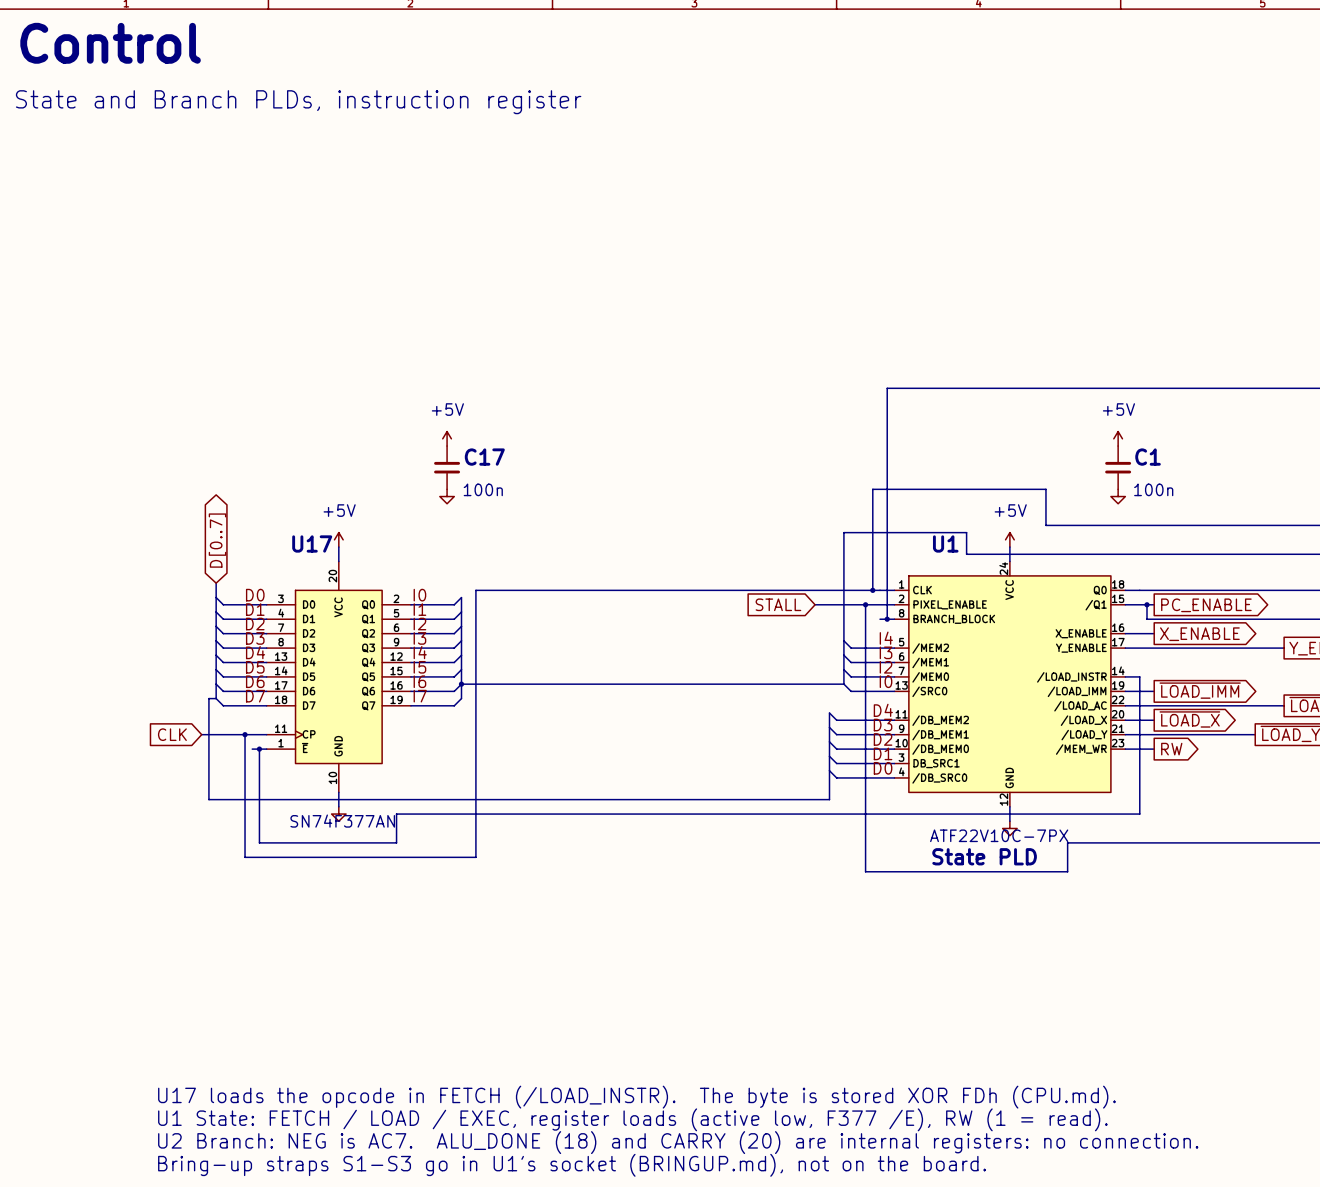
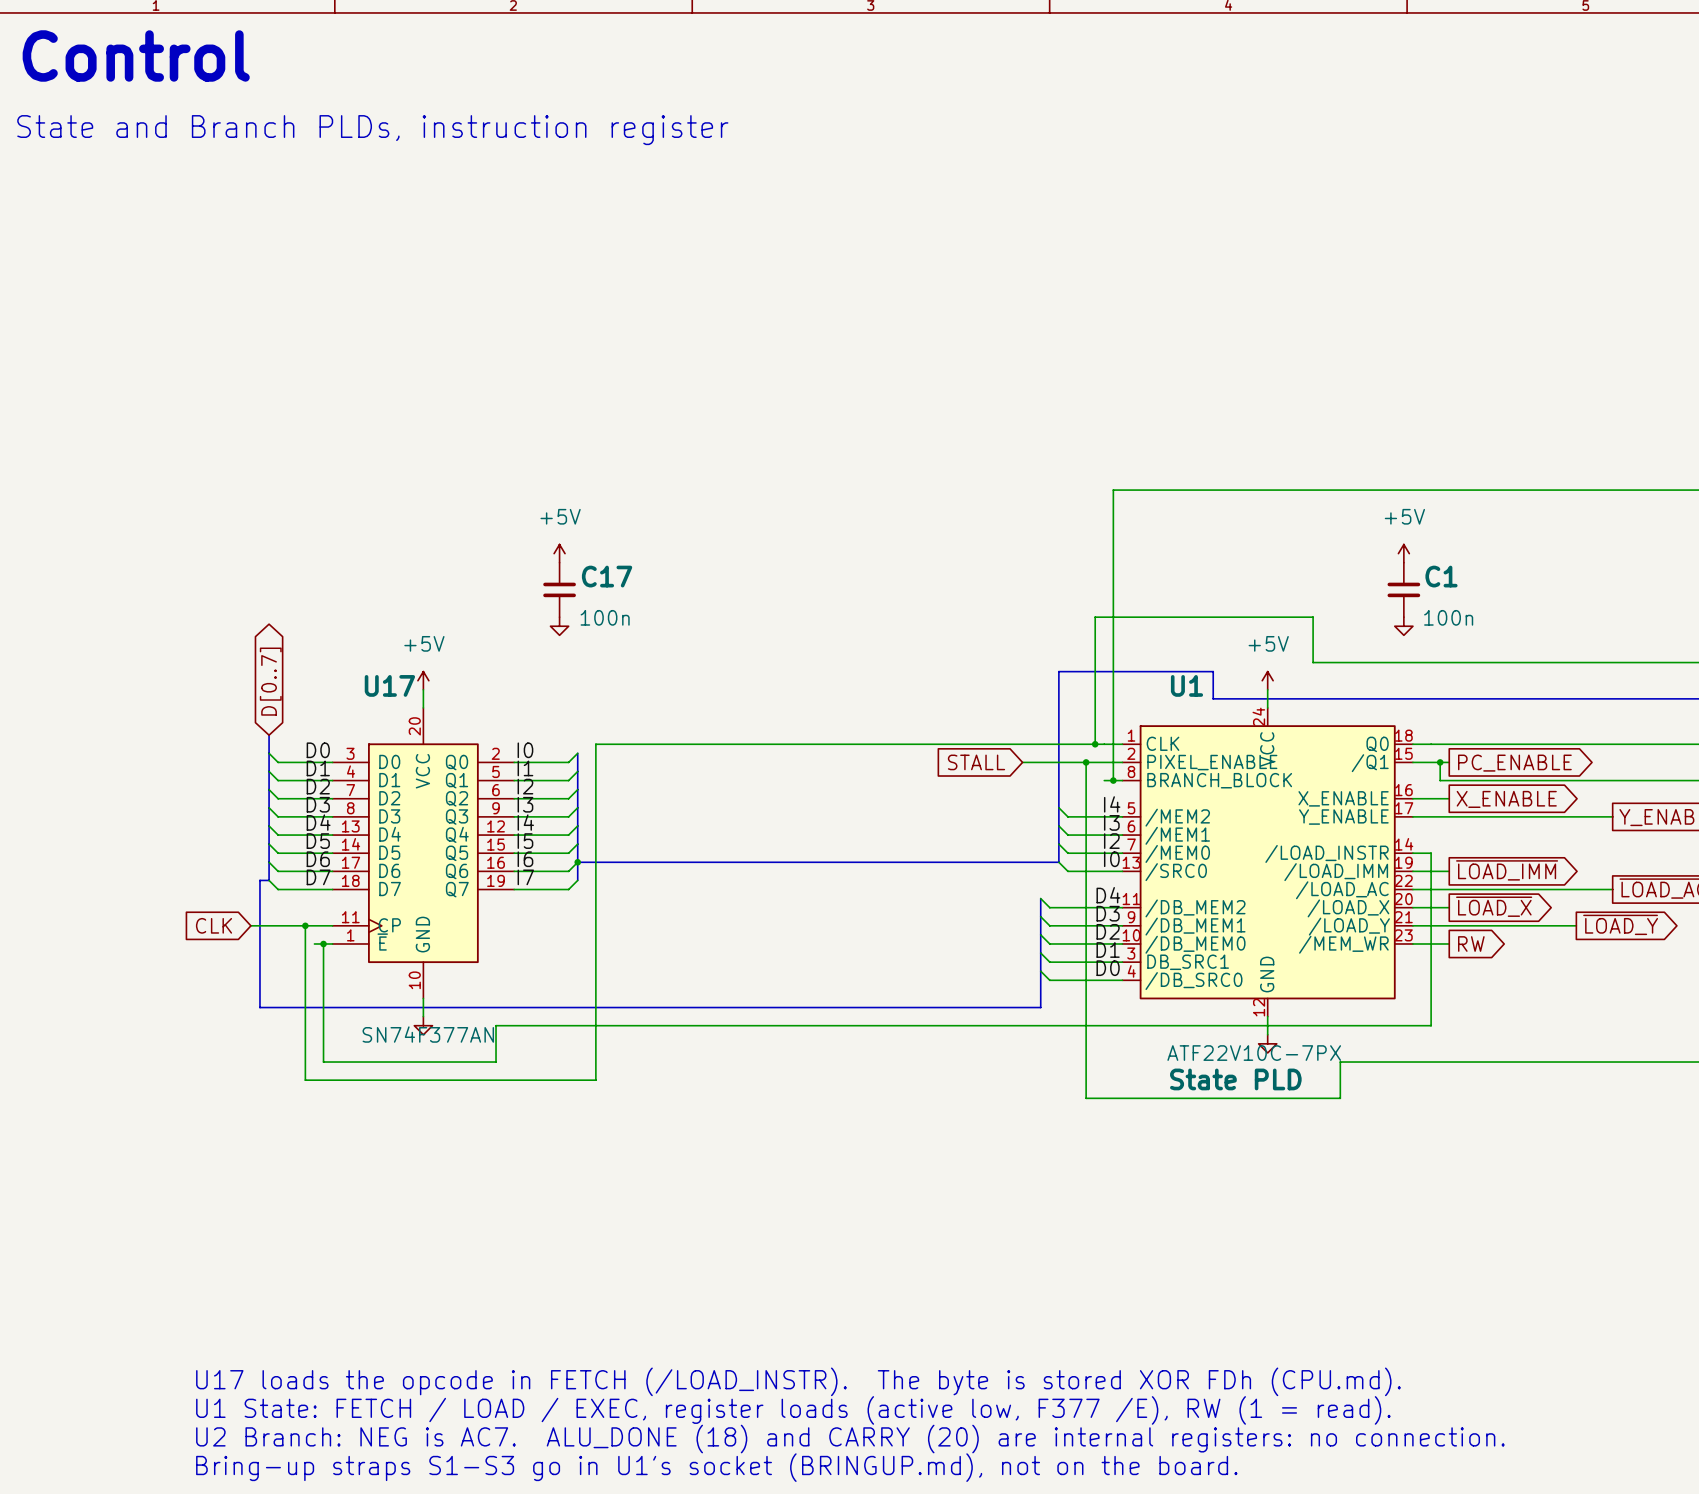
U17 symbol: [266, 561, 411, 793] -> [332, 707, 515, 999]
U1 symbol: [894, 561, 1126, 807] -> [1122, 707, 1413, 1017]

